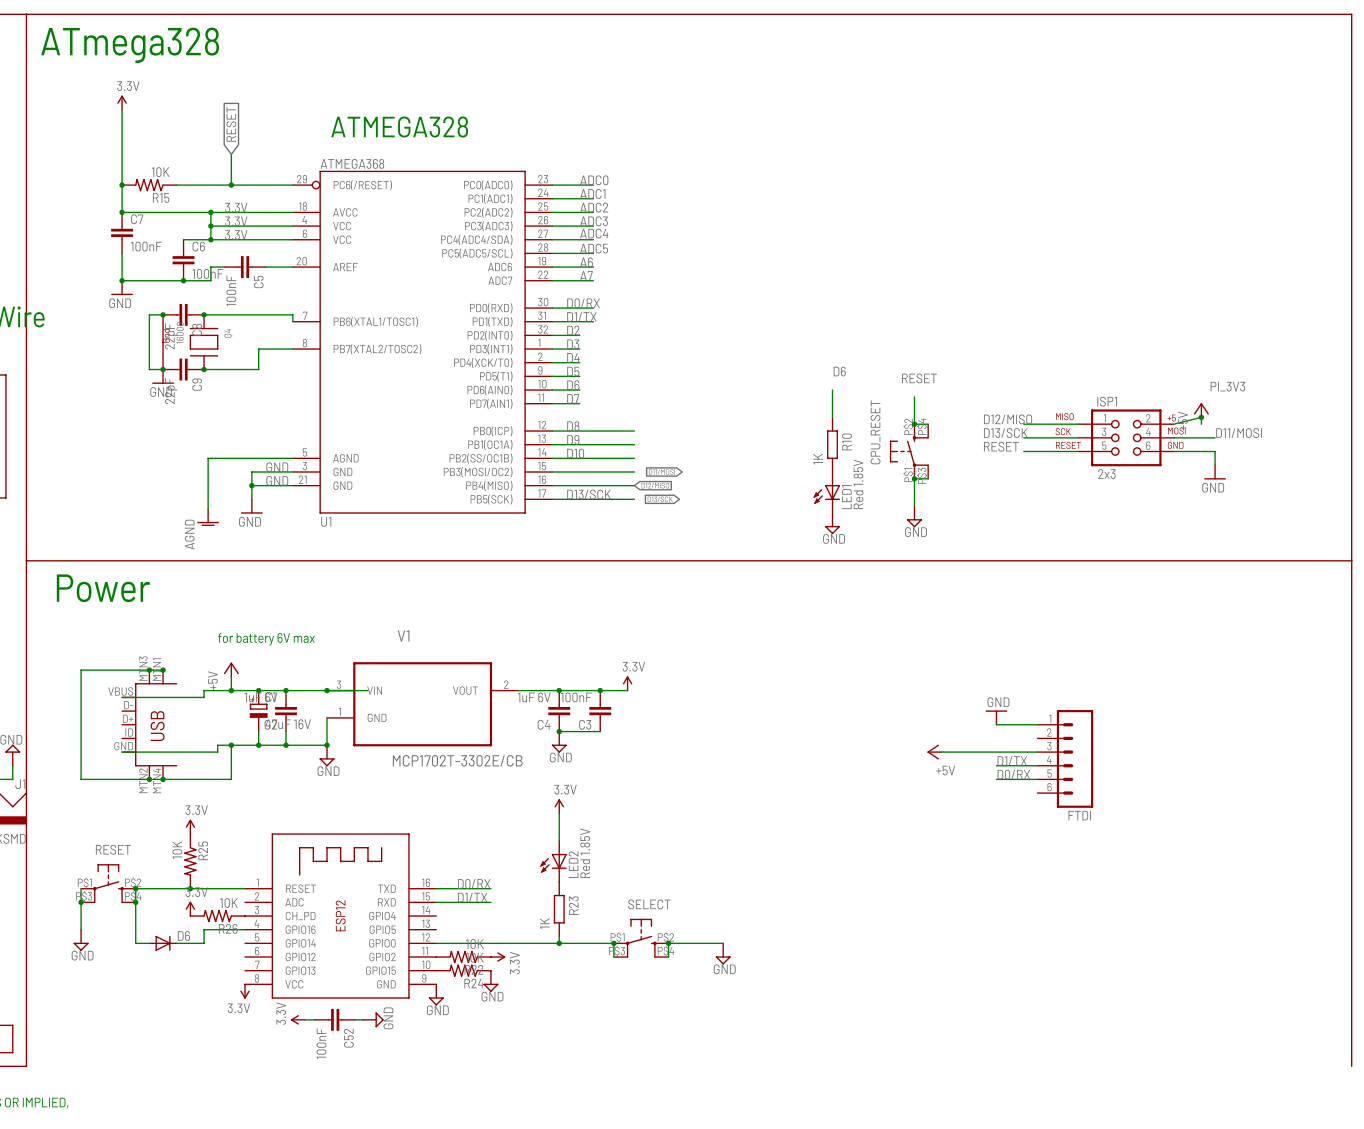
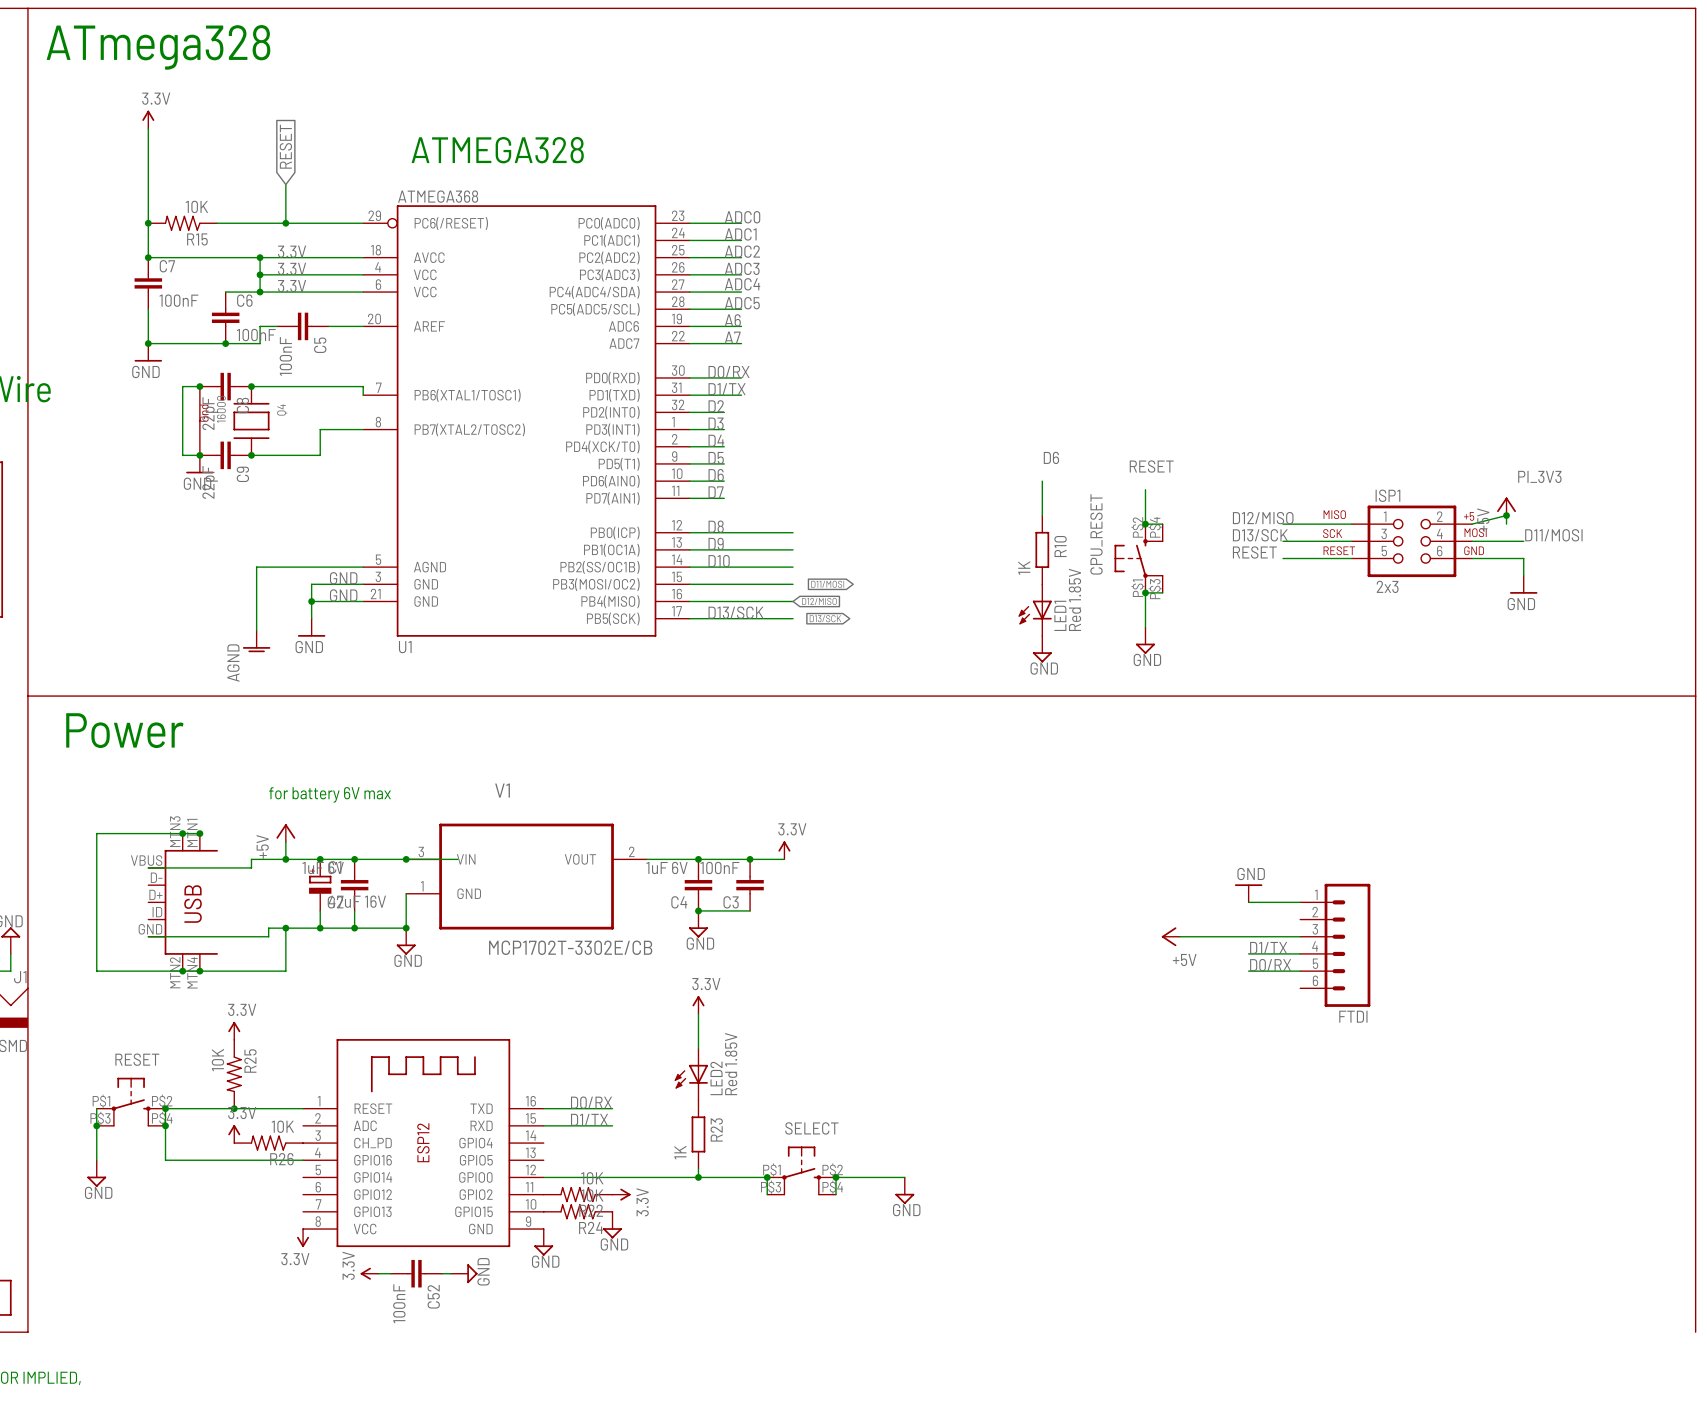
wire: (135, 929) (135, 943) (149, 943) -> none
wire: (204, 929) (204, 943) (176, 943) -> (251, 1160) (165, 1160)
D6: (163, 943) -> none

